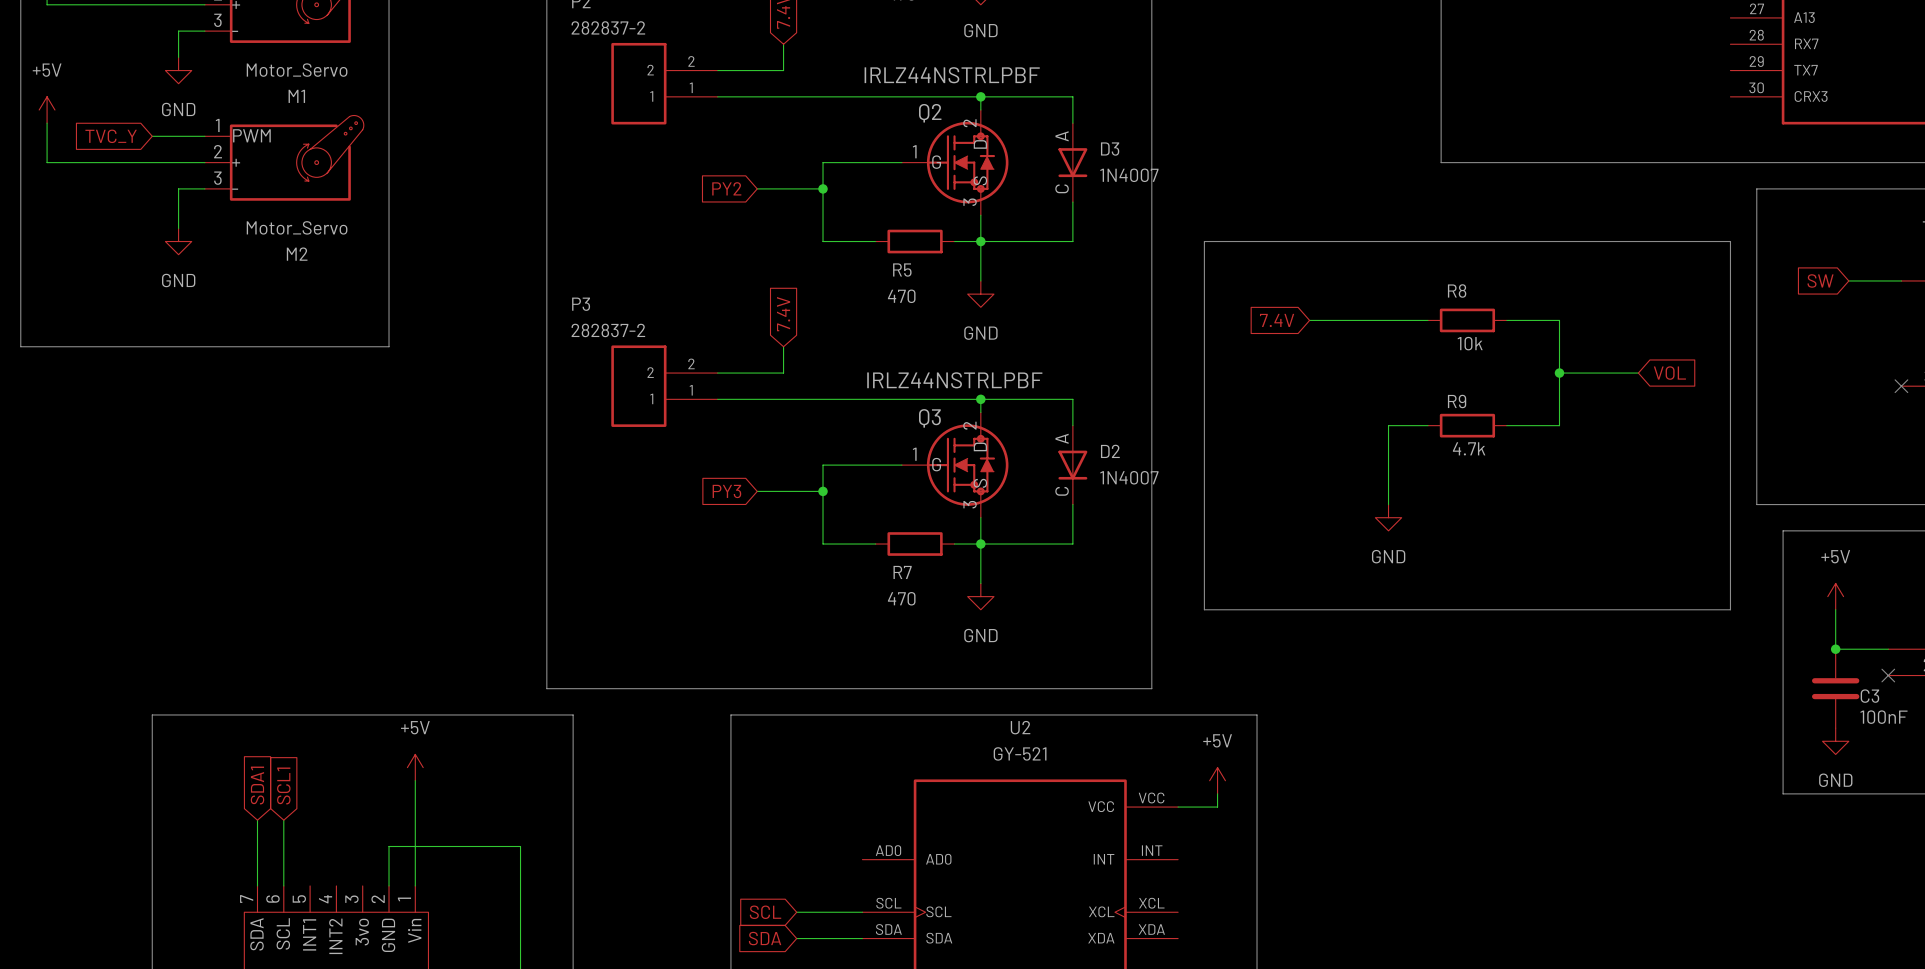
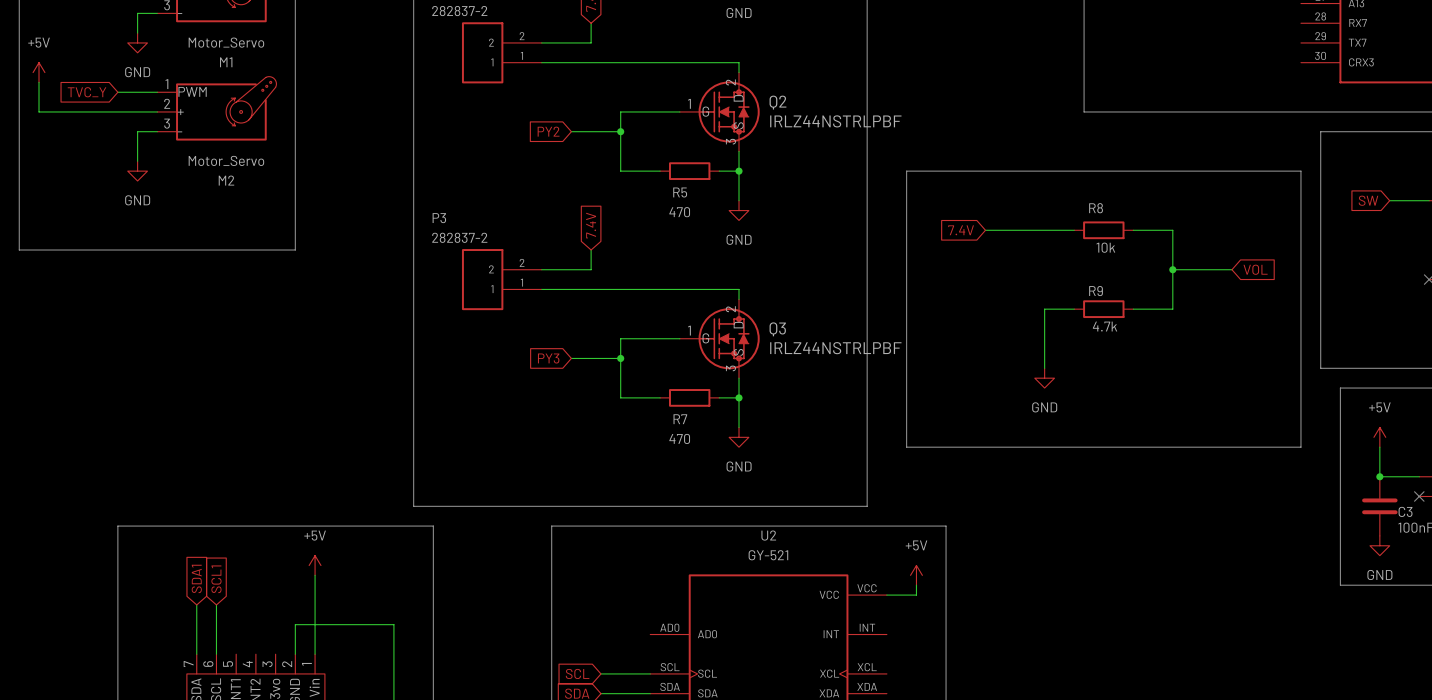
Q2 value position: IRLZ44NSTRLPBF (952, 75) -> IRLZ44NSTRLPBF (835, 121)
wire: (980, 96) (1072, 96) (1072, 123) -> none
junction: (980, 96) -> none
Q2 name position: Q2 (930, 113) -> Q2 (777, 102)
D3: 1N4007 (1072, 162) -> none
wire: (1072, 202) (1072, 241) (980, 241) -> none
Q3 value position: IRLZ44NSTRLPBF (954, 380) -> IRLZ44NSTRLPBF (835, 348)
wire: (980, 399) (1072, 399) (1072, 425) -> none
junction: (980, 399) -> none
Q3 name position: Q3 (929, 418) -> Q3 (777, 329)
D2: 1N4007 (1072, 465) -> none
wire: (1072, 504) (1072, 544) (980, 544) -> none

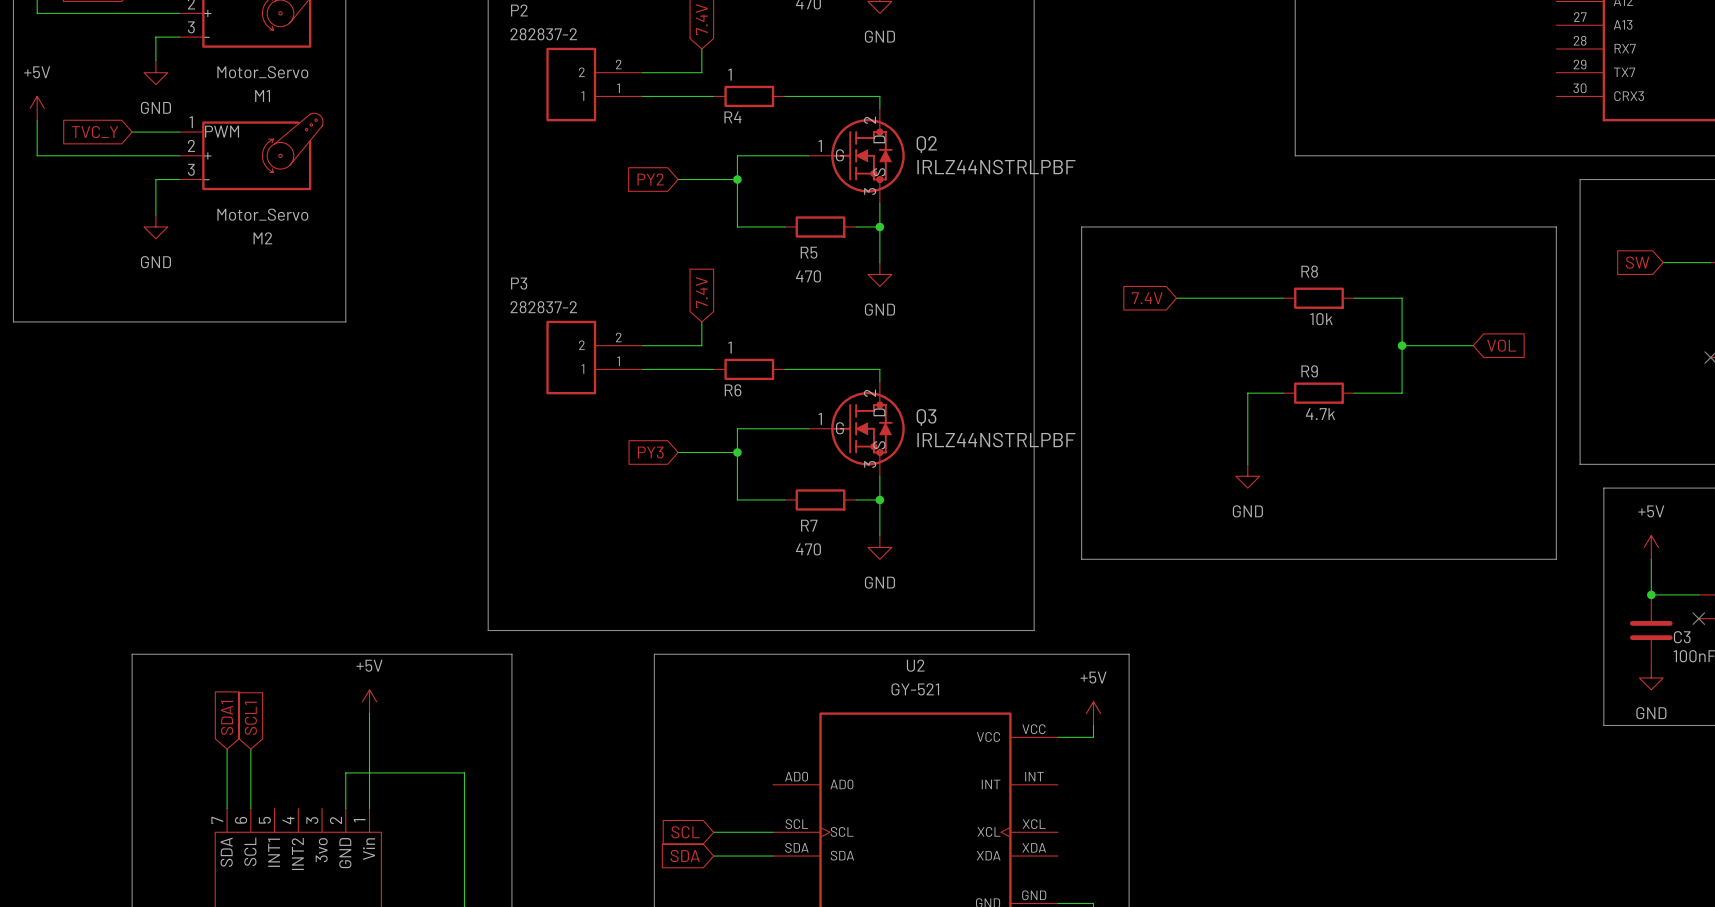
wire: (600, 62) (660, 62) -> none
R4: none -> 1 (749, 96)
wire: (600, 289) (660, 289) -> none
R6: none -> 1 (749, 369)

